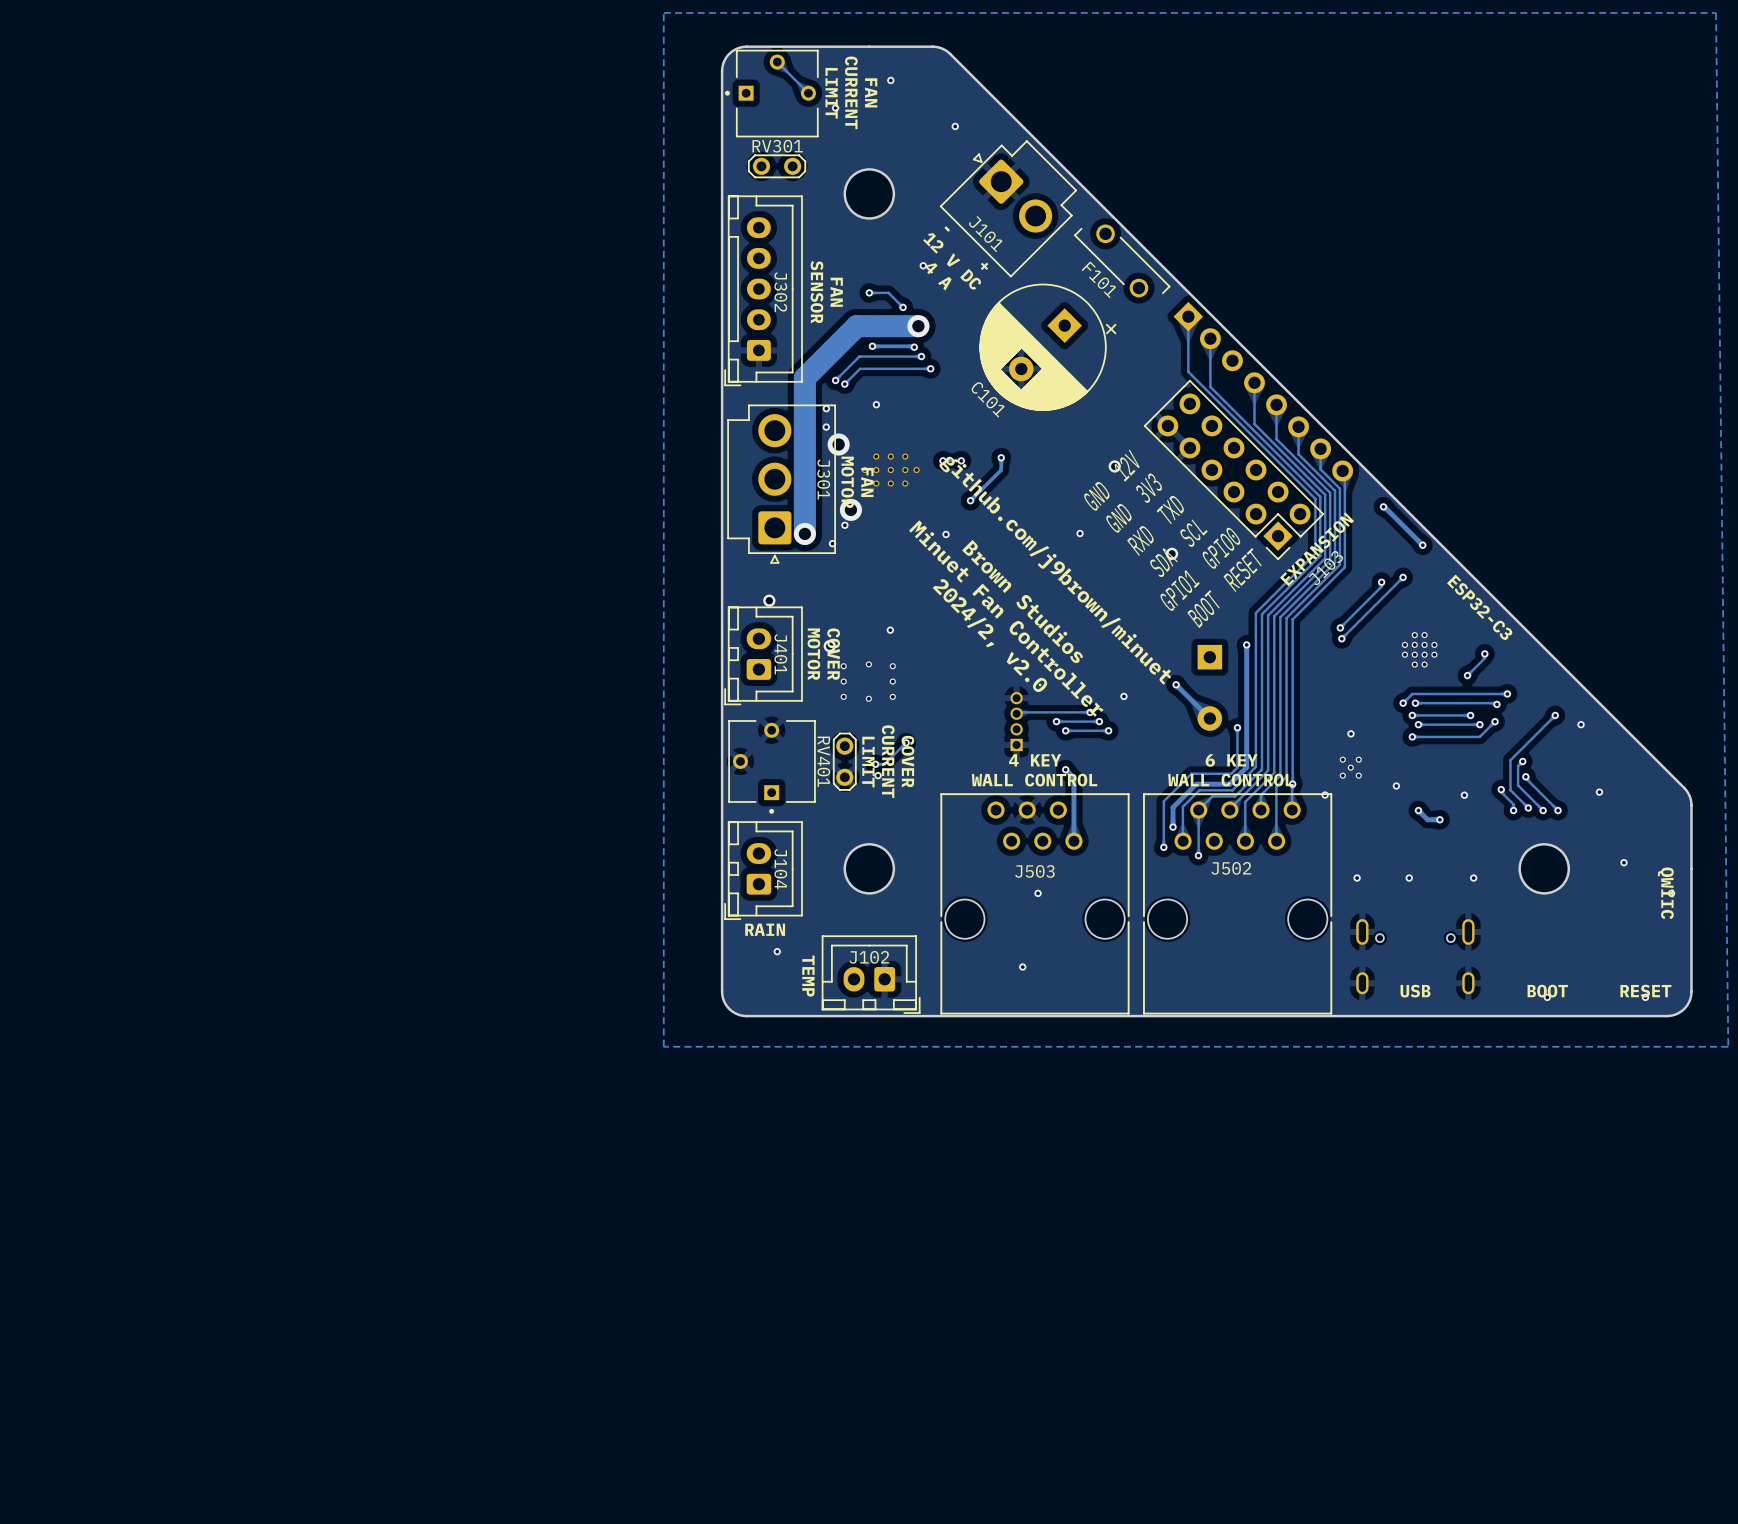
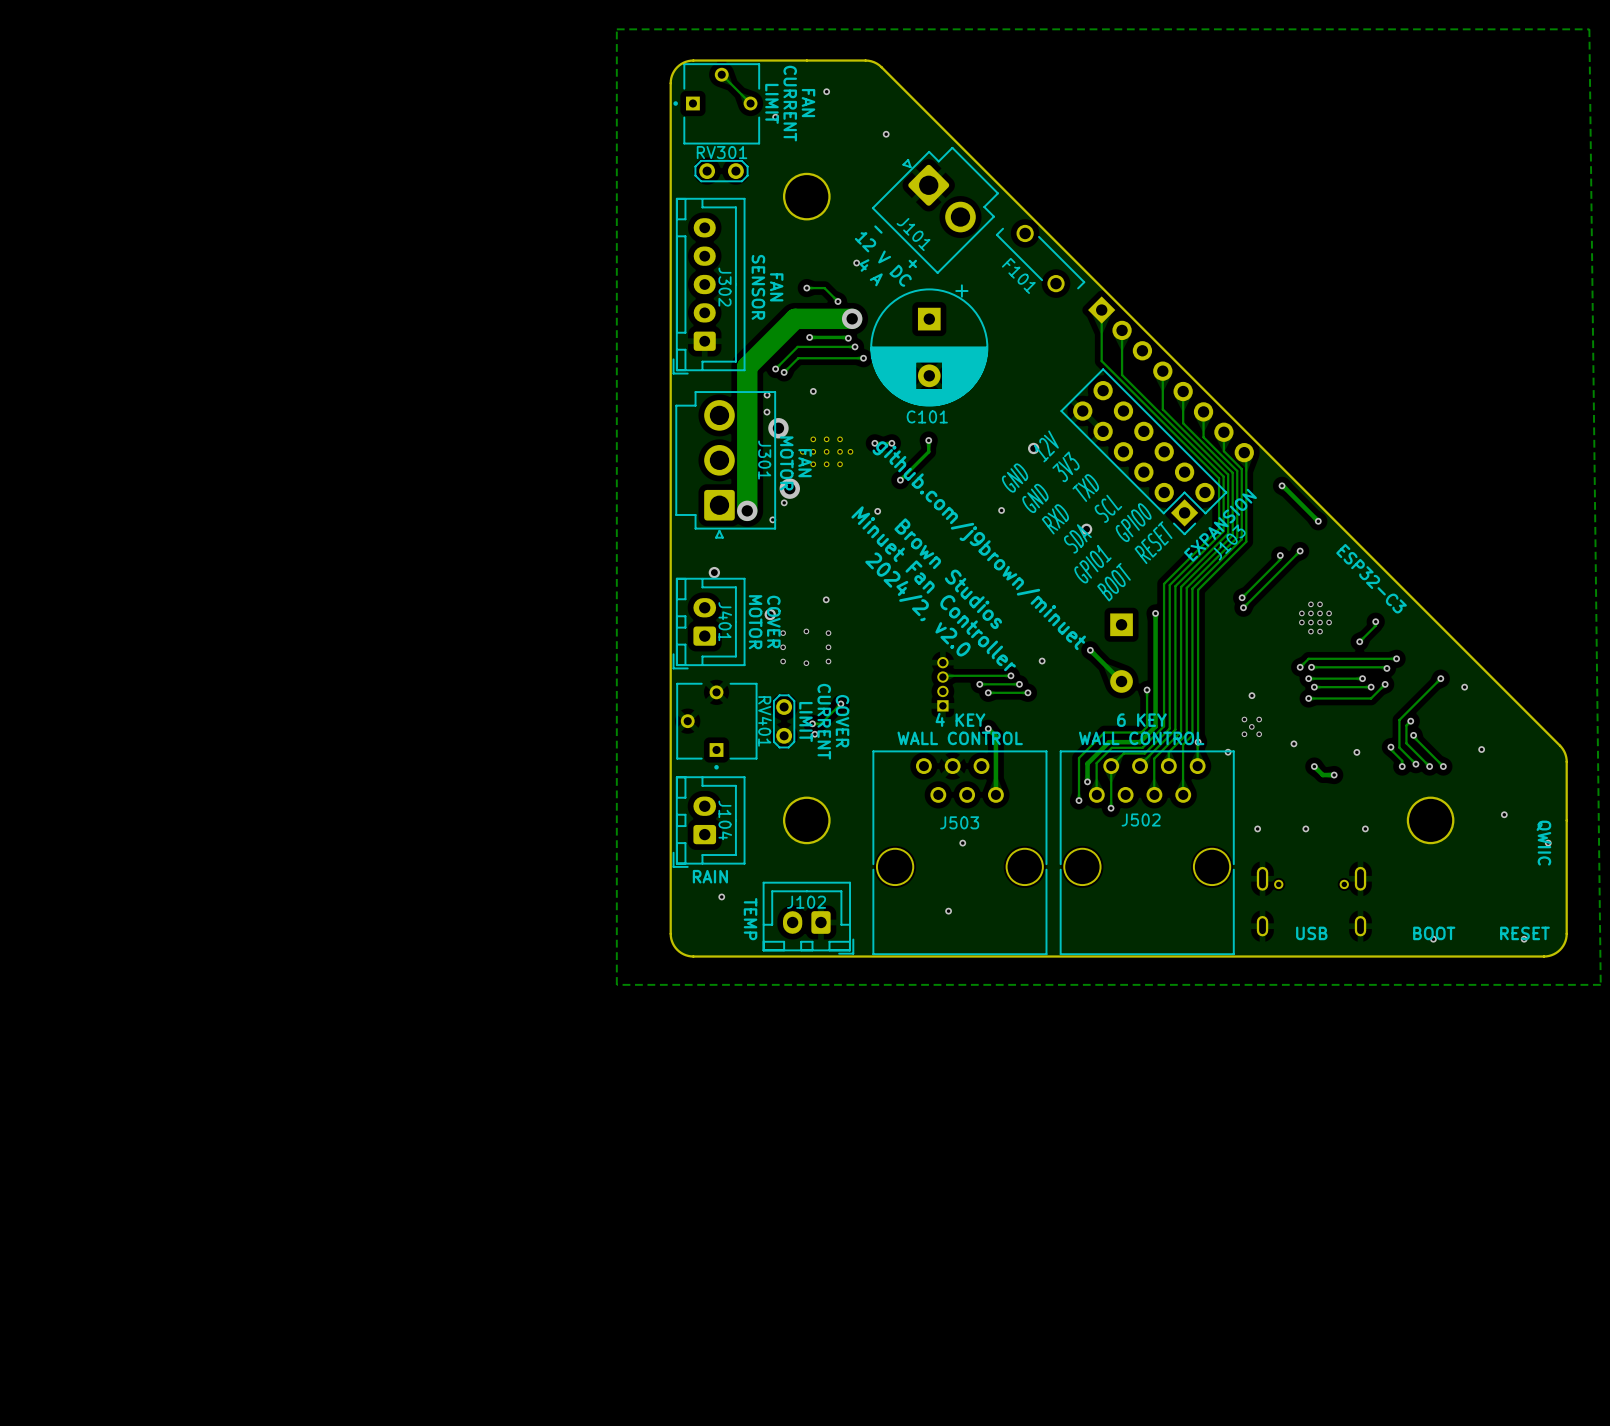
C101 rotation: 0° (1047, 347) -> 45° counterclockwise (929, 345)

